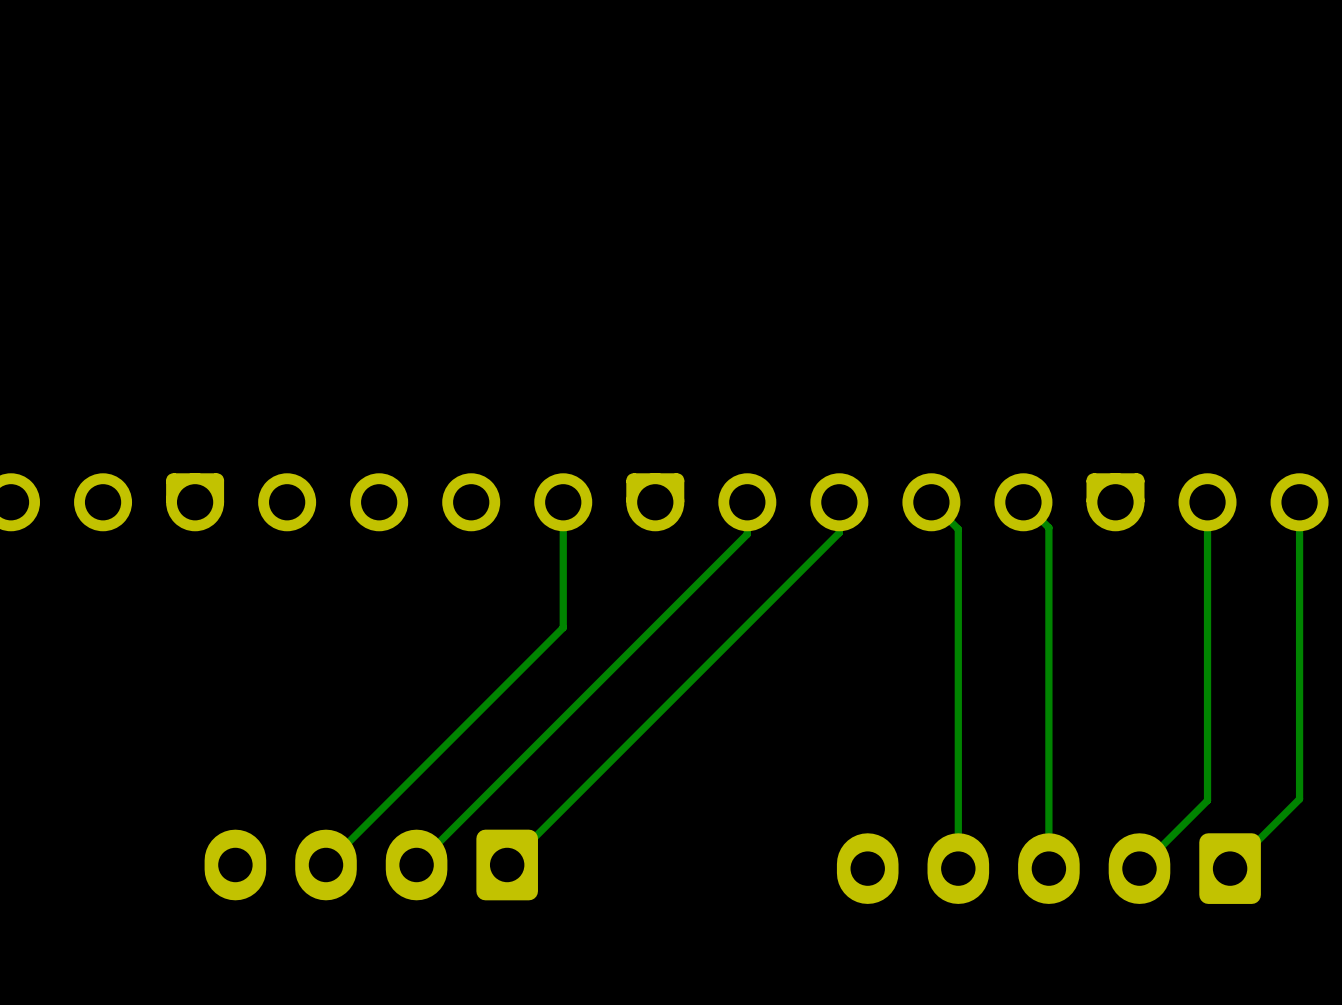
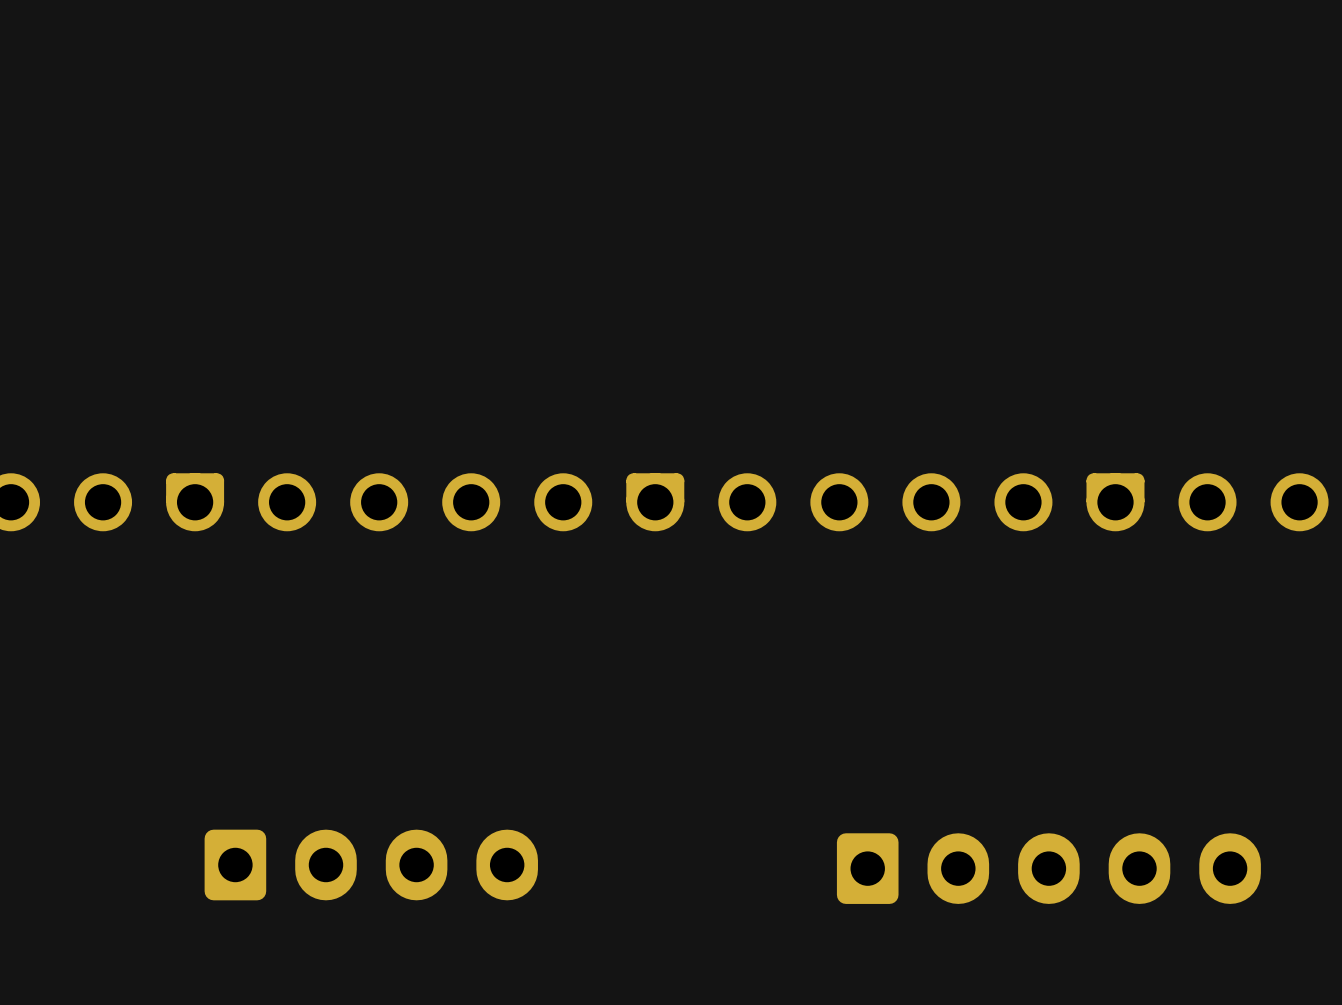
track: (563, 502) (563, 627) (325, 864) -> none
track: (747, 502) (747, 534) (416, 864) -> none
track: (839, 502) (839, 532) (507, 864) -> none
track: (931, 502) (958, 529) (958, 868) -> none
track: (1023, 502) (1048, 527) (1048, 868) -> none
track: (1207, 502) (1207, 800) (1139, 868) -> none
track: (1299, 502) (1299, 799) (1230, 868) -> none
part rotation: 0° (371, 864) -> 180° (371, 864)
part rotation: 0° (1048, 868) -> 180° (1048, 868)

